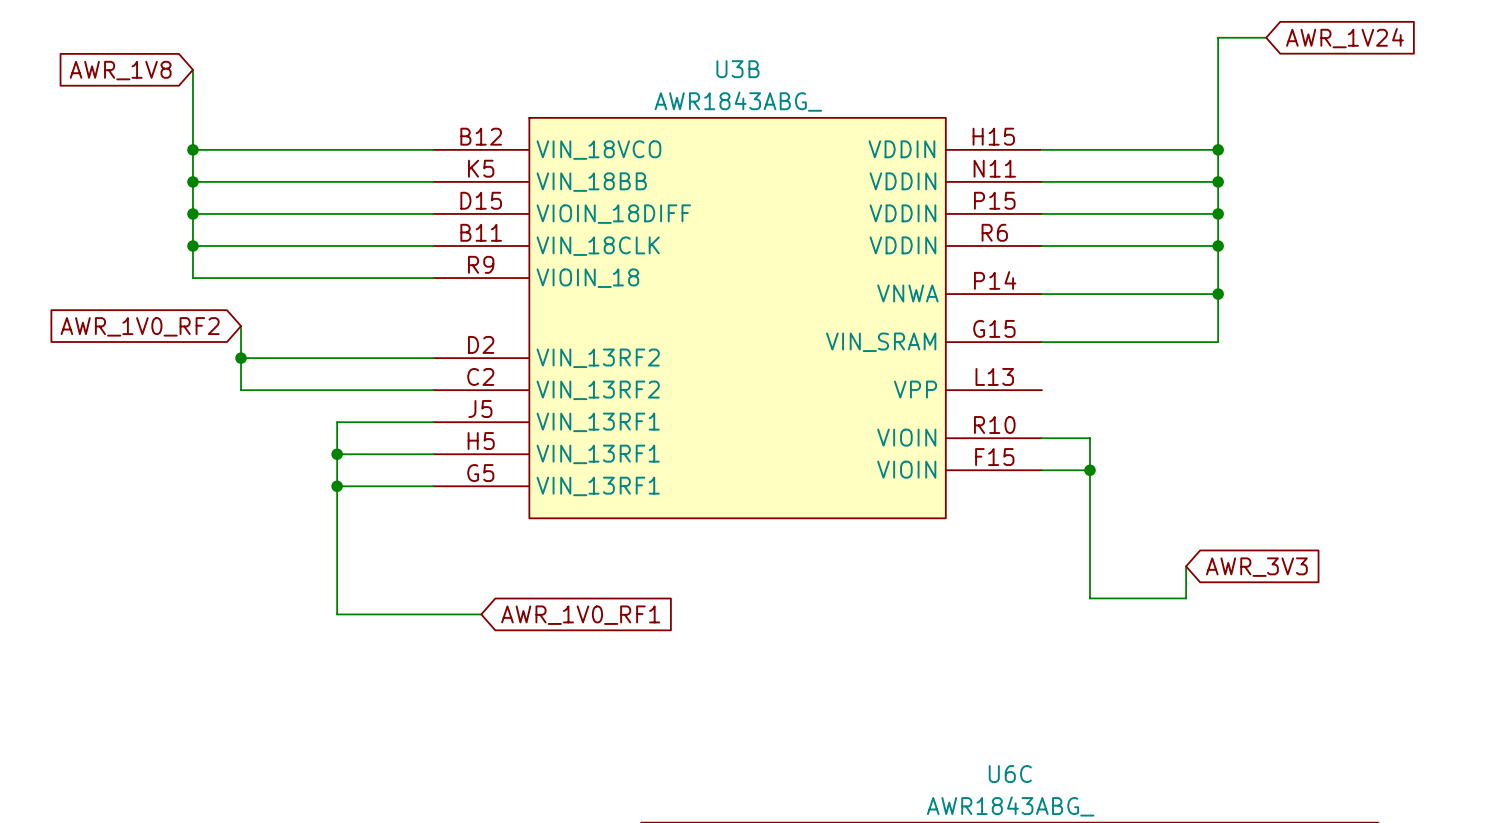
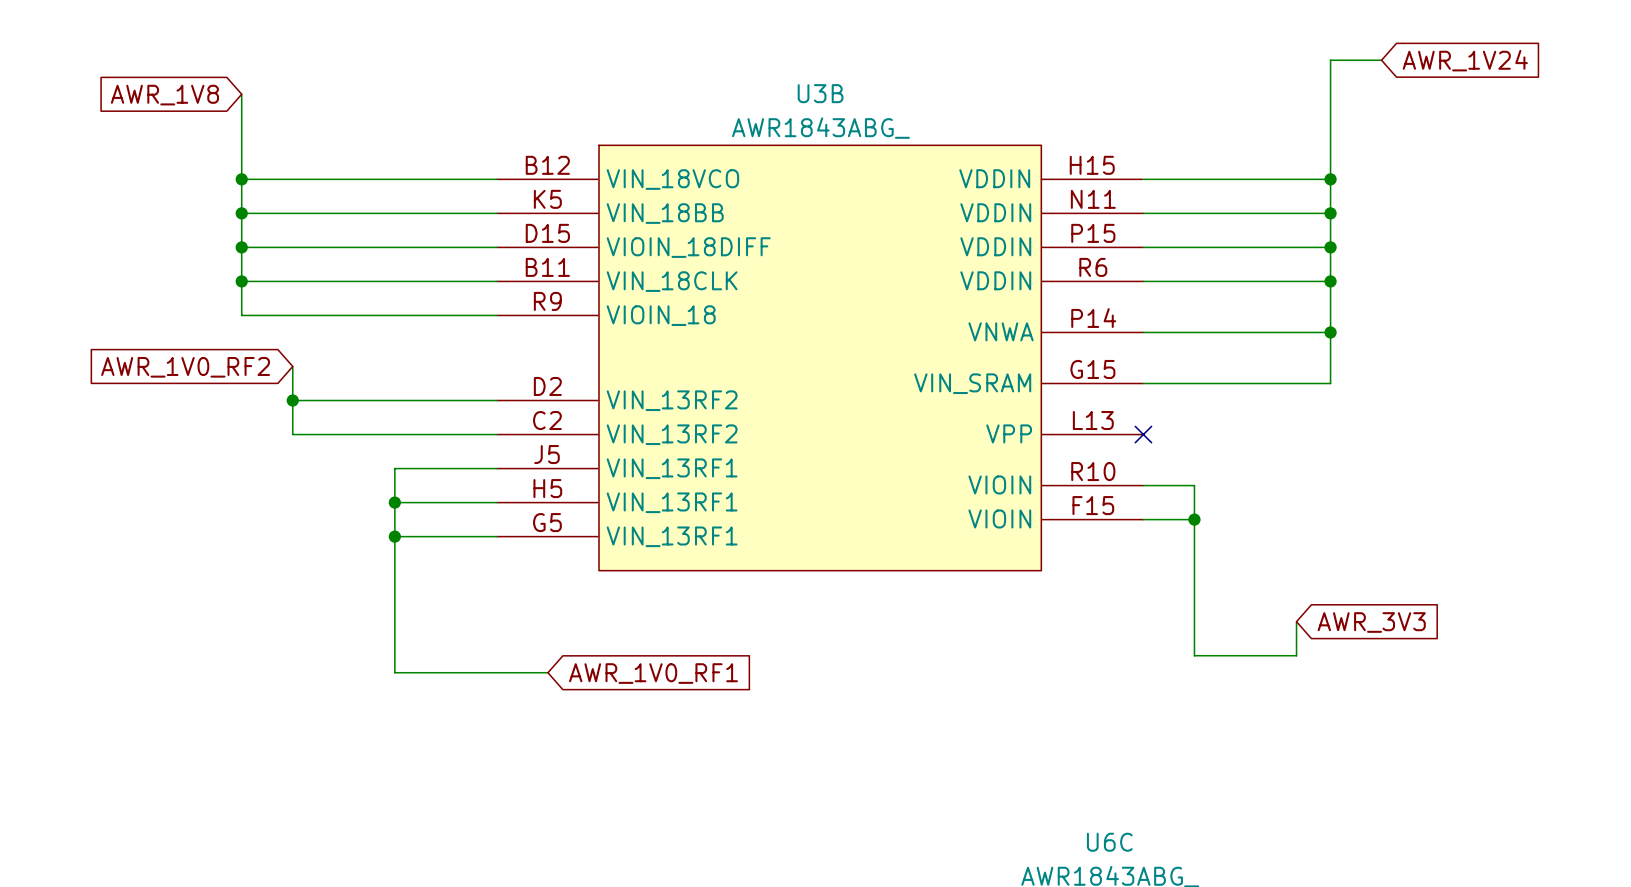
no-connect mark: none -> (1143, 434)

